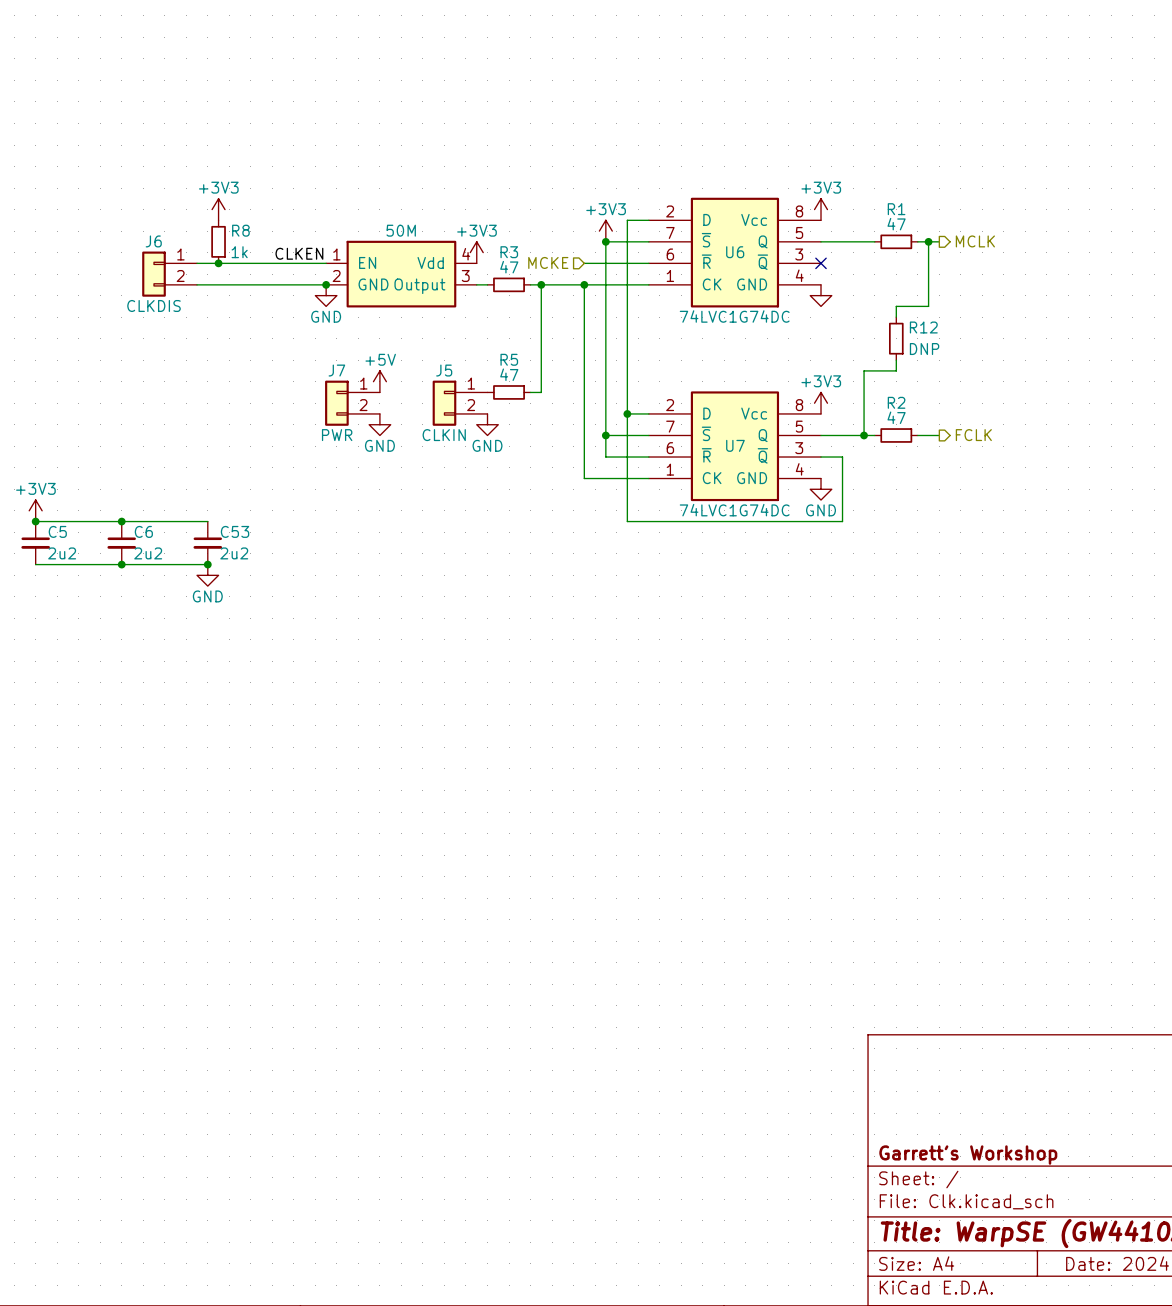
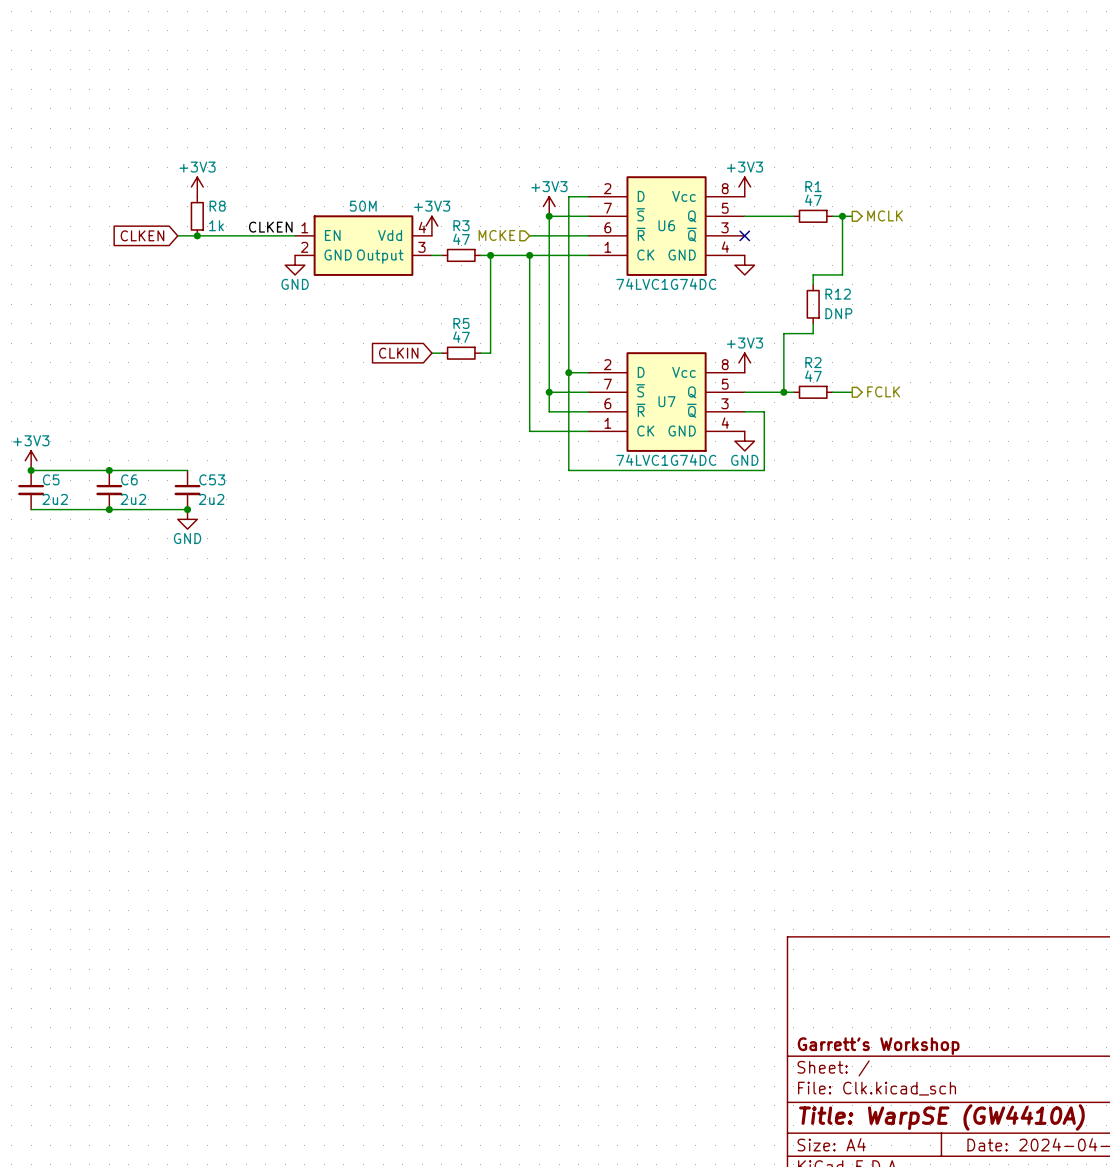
global label: none -> CLKEN (142, 235)
J6: CLKDIS (169, 274) -> none
wire: (197, 284) (326, 284) -> none
junction: (326, 284) -> none
power symbol: +5V (379, 381) -> none
global label: none -> CLKIN (398, 353)
J7: PWR (352, 403) -> none
J5: CLKIN (460, 403) -> none
power symbol: GND (379, 424) -> none
power symbol: GND (487, 424) -> none

